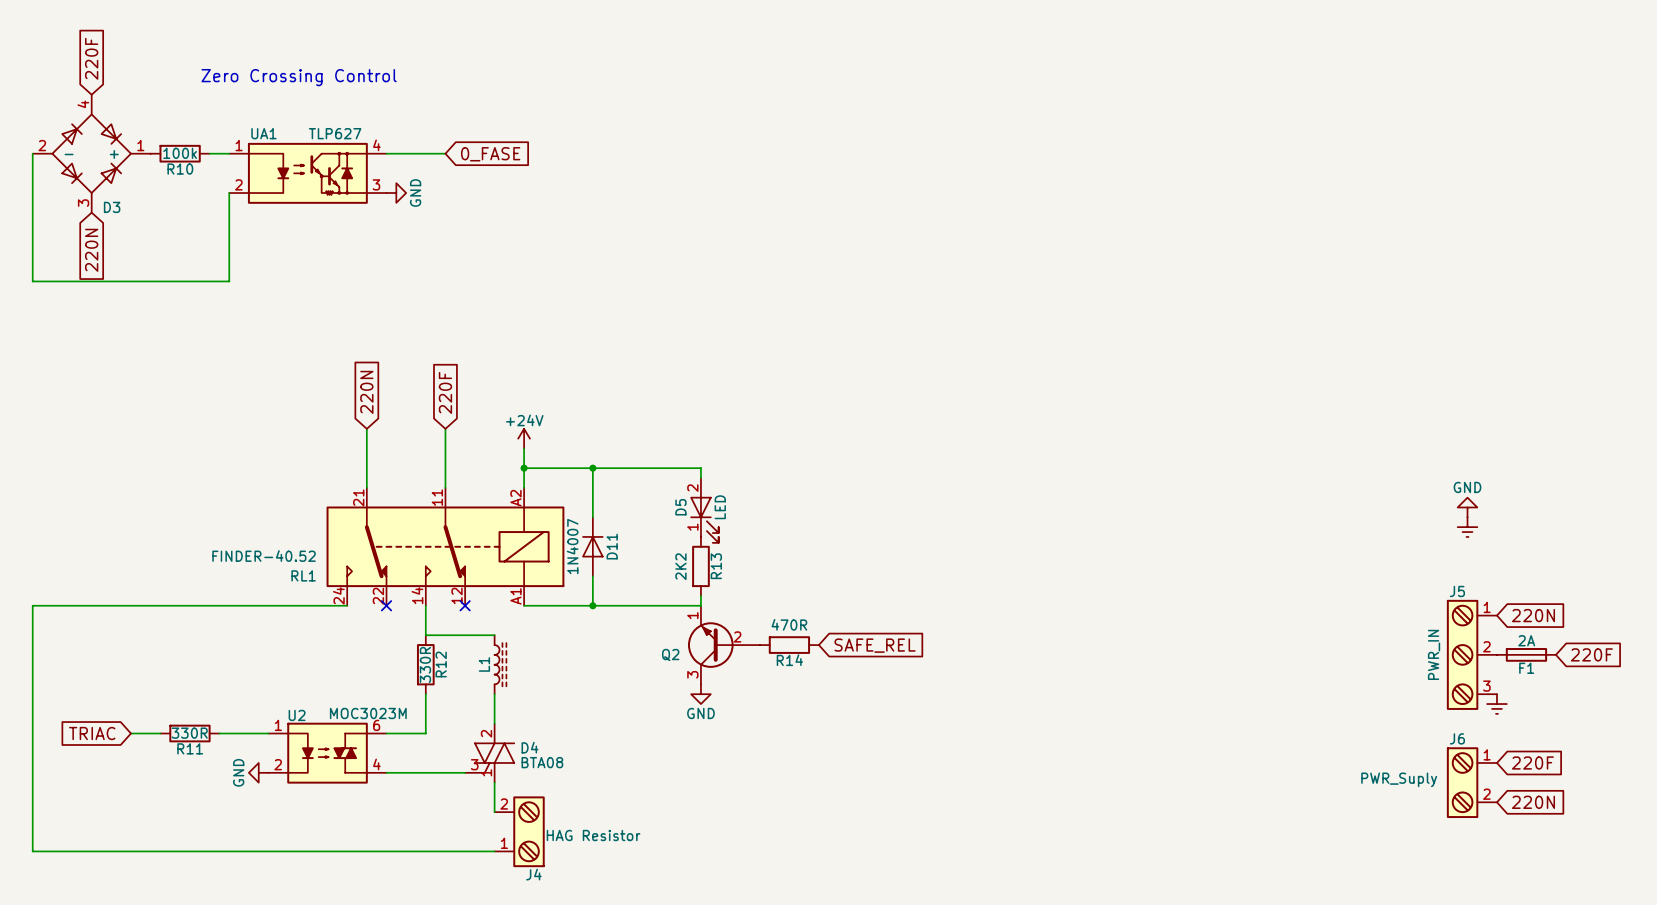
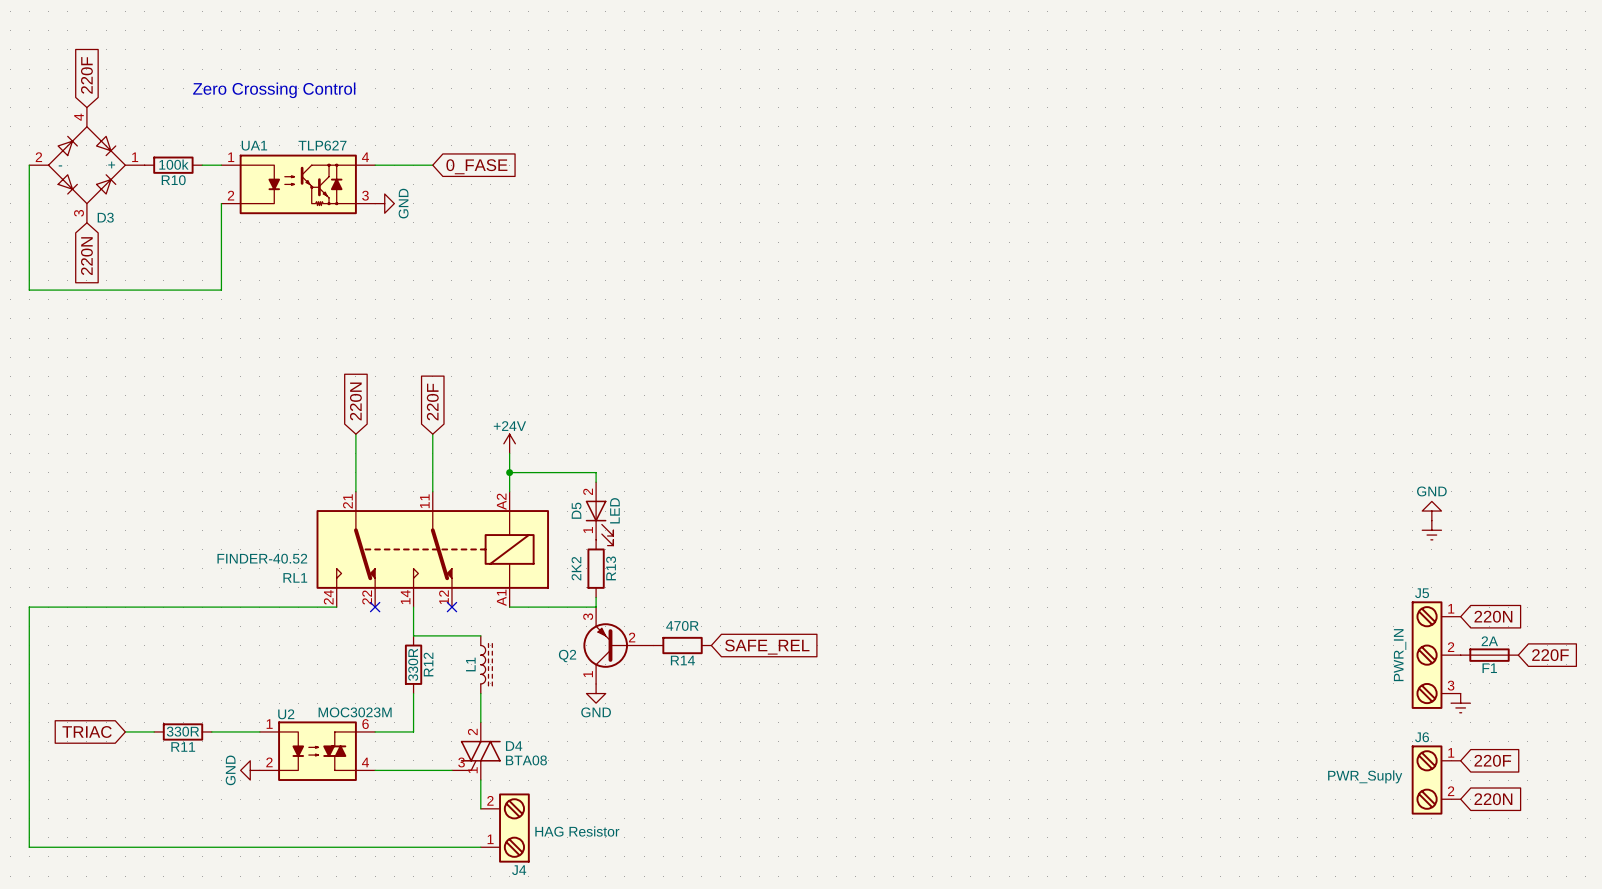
wire: (592, 468) (592, 517) -> none
junction: (592, 468) -> none
wire: (612, 468) (700, 468) (700, 478) -> (596, 472) (596, 482)
D5 position: (704, 510) -> (599, 513)
D11: 1N4007 (592, 546) -> none
R13 position: (700, 566) -> (596, 568)
wire: (592, 576) (592, 605) -> none
wire: (700, 595) (700, 605) (612, 605) -> (596, 597) (596, 607)
junction: (592, 605) -> none
Q2 symbol: [688, 605, 760, 685] -> [583, 607, 654, 684]
R14 position: (789, 645) -> (682, 645)
global label position: SAFE_REL (875, 645) -> SAFE_REL (767, 647)
power symbol position: GND (700, 694) -> GND (596, 693)

